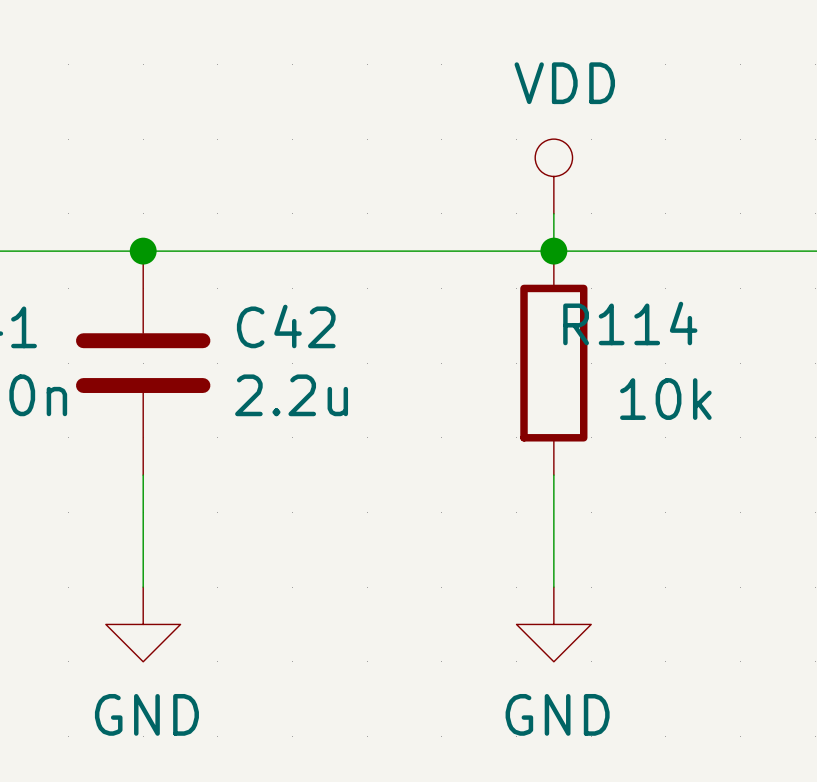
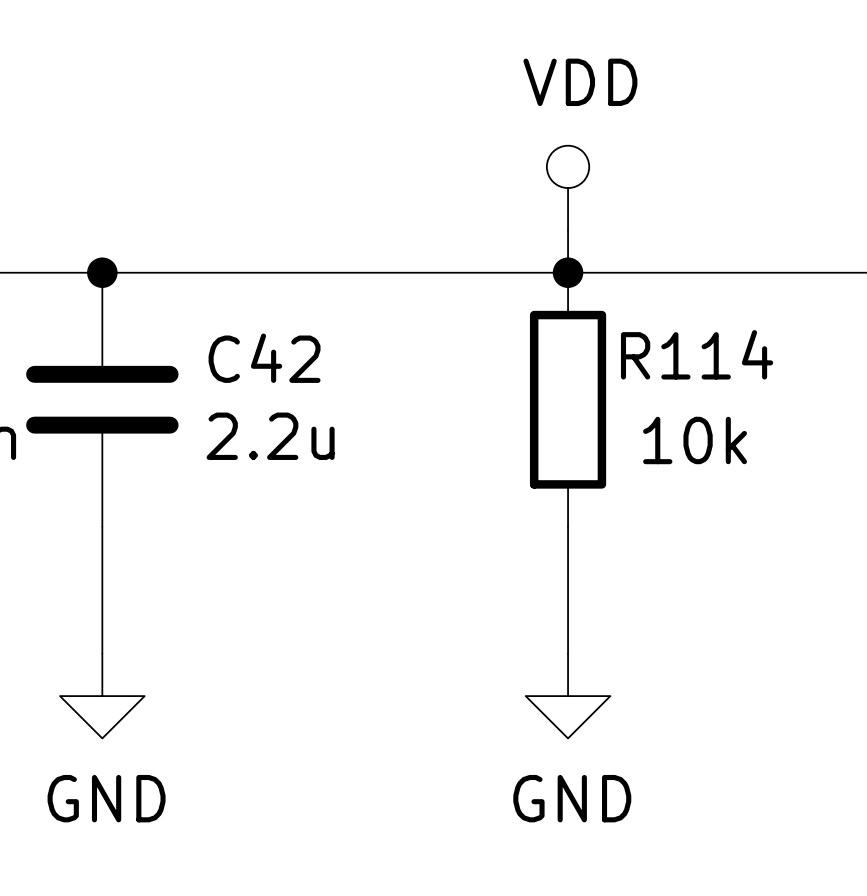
R114 name position: R114 (630, 323) -> R114 (697, 354)

